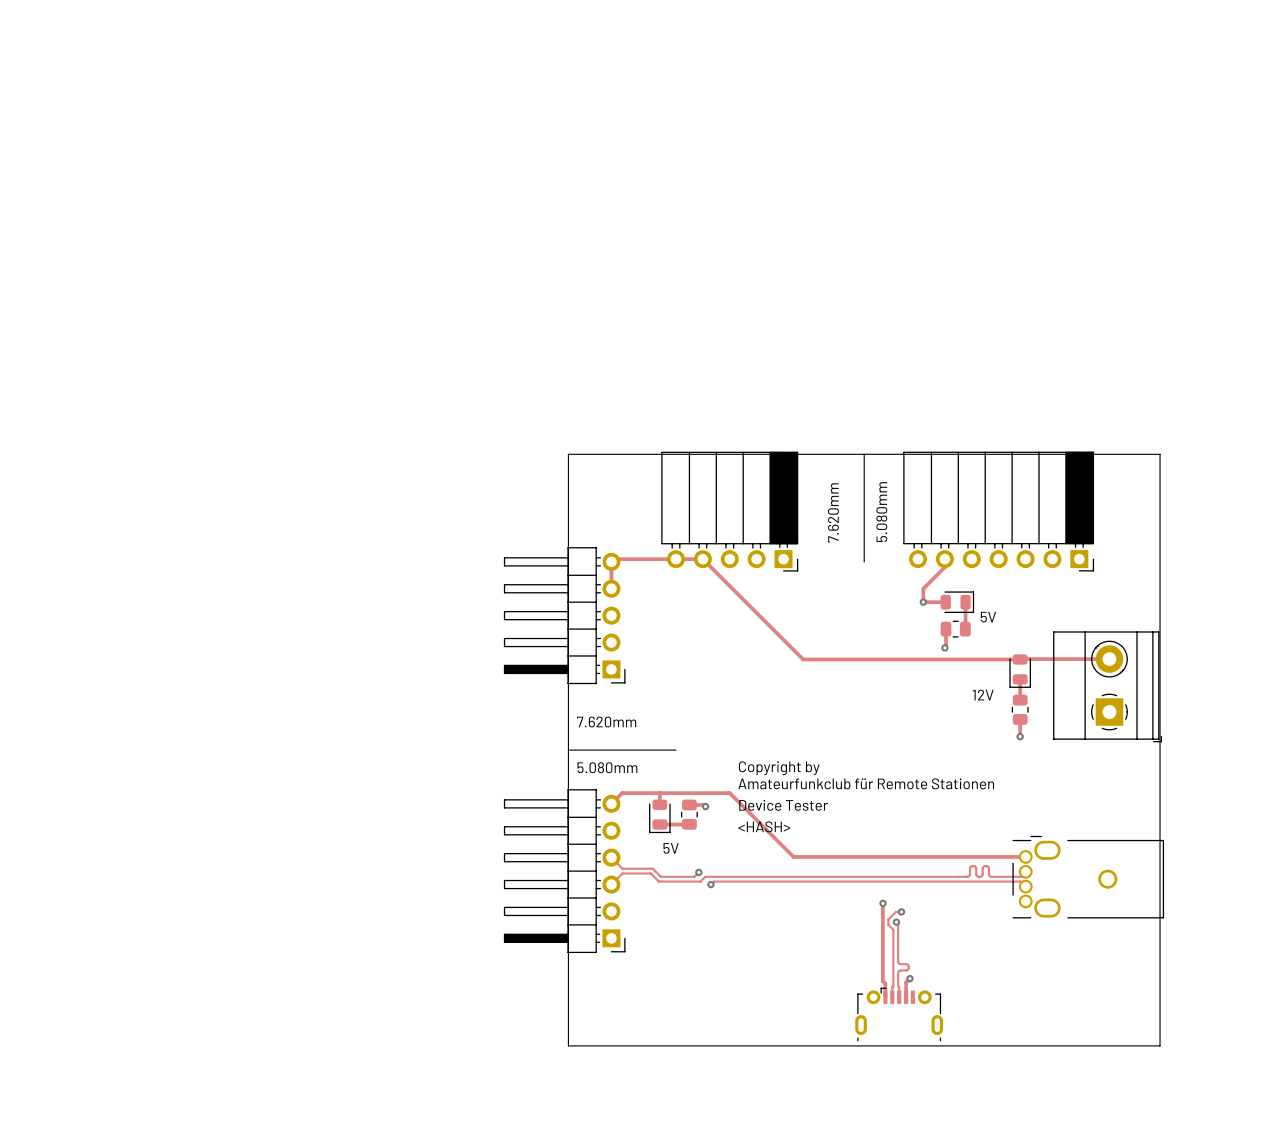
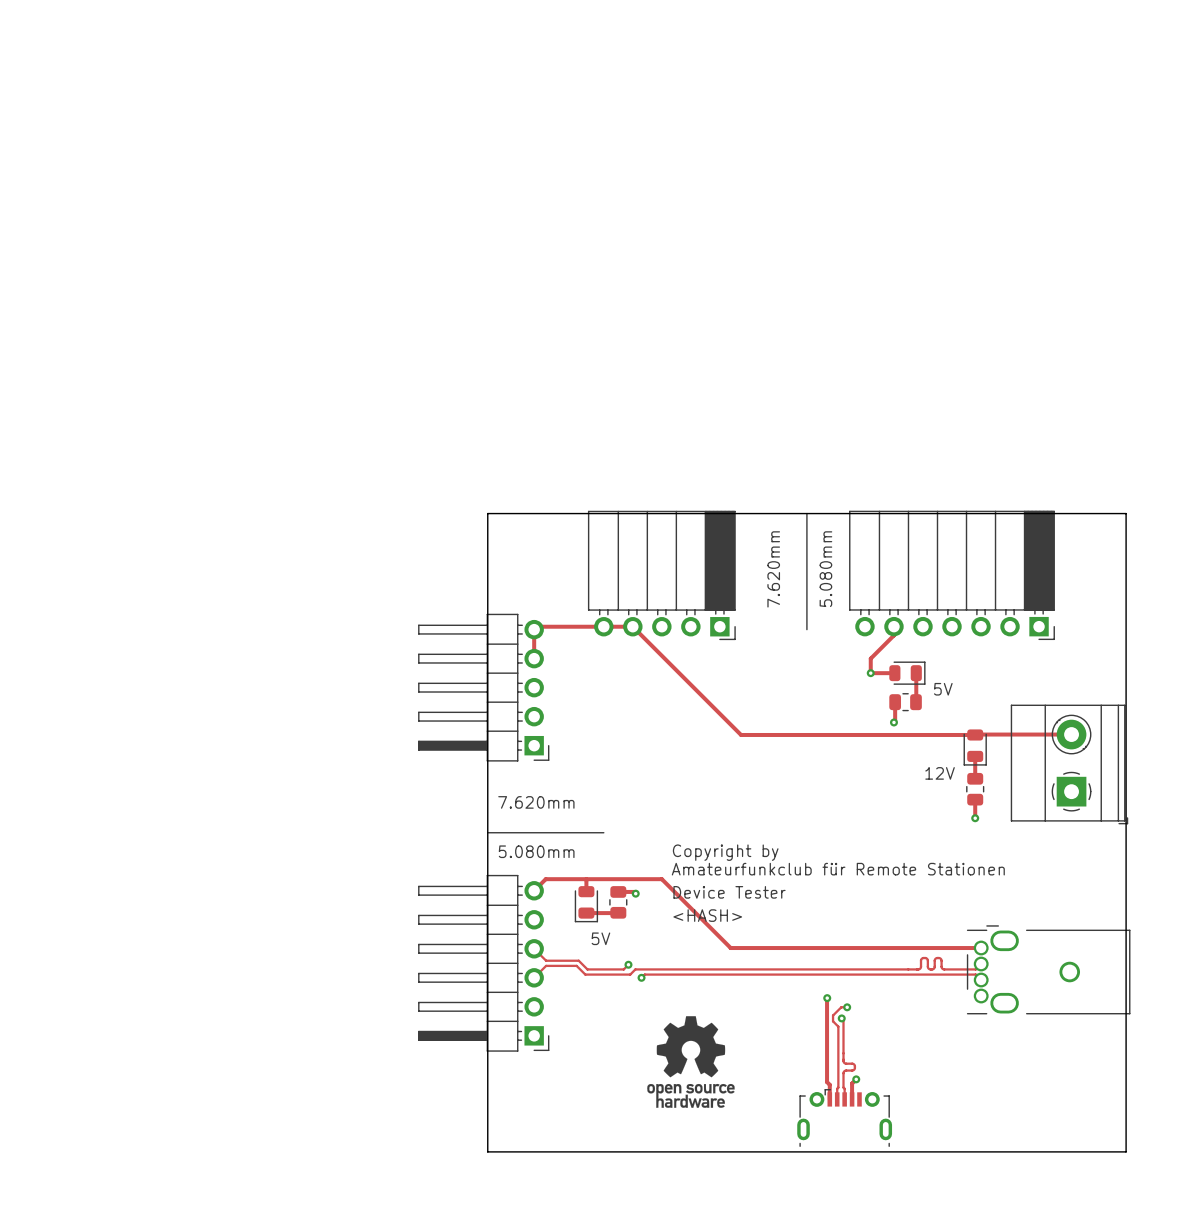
drawing: none -> [647, 1016, 735, 1108]

